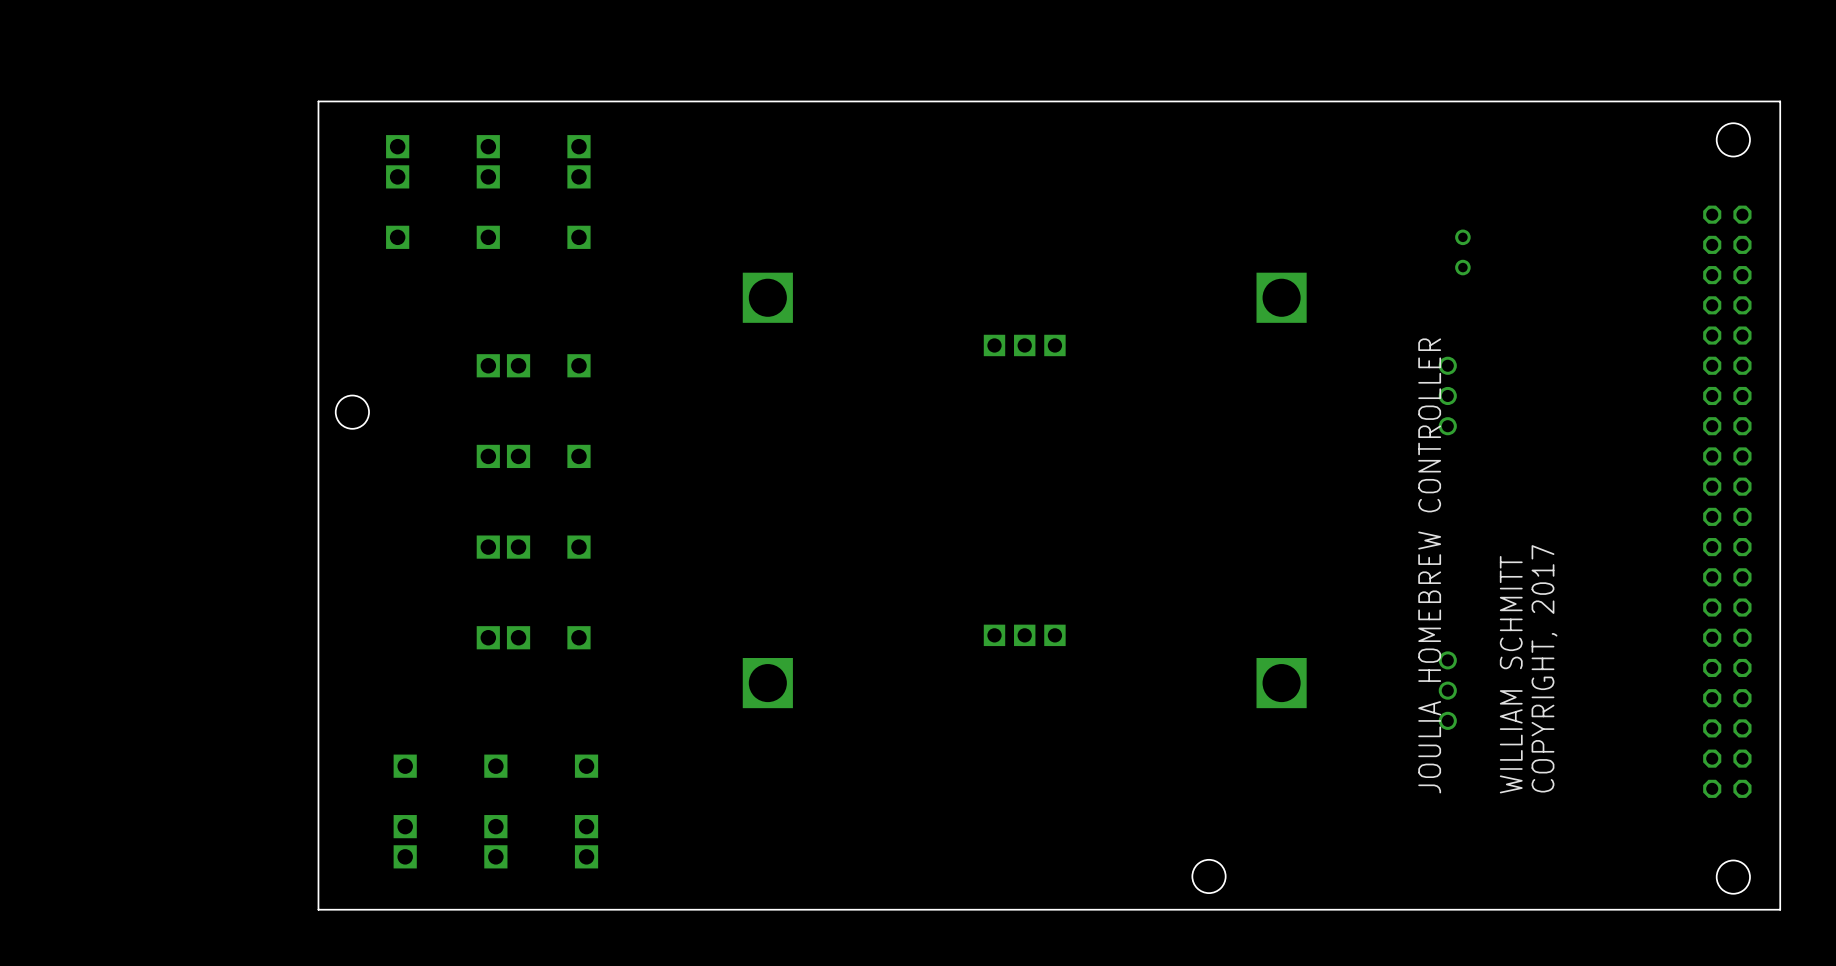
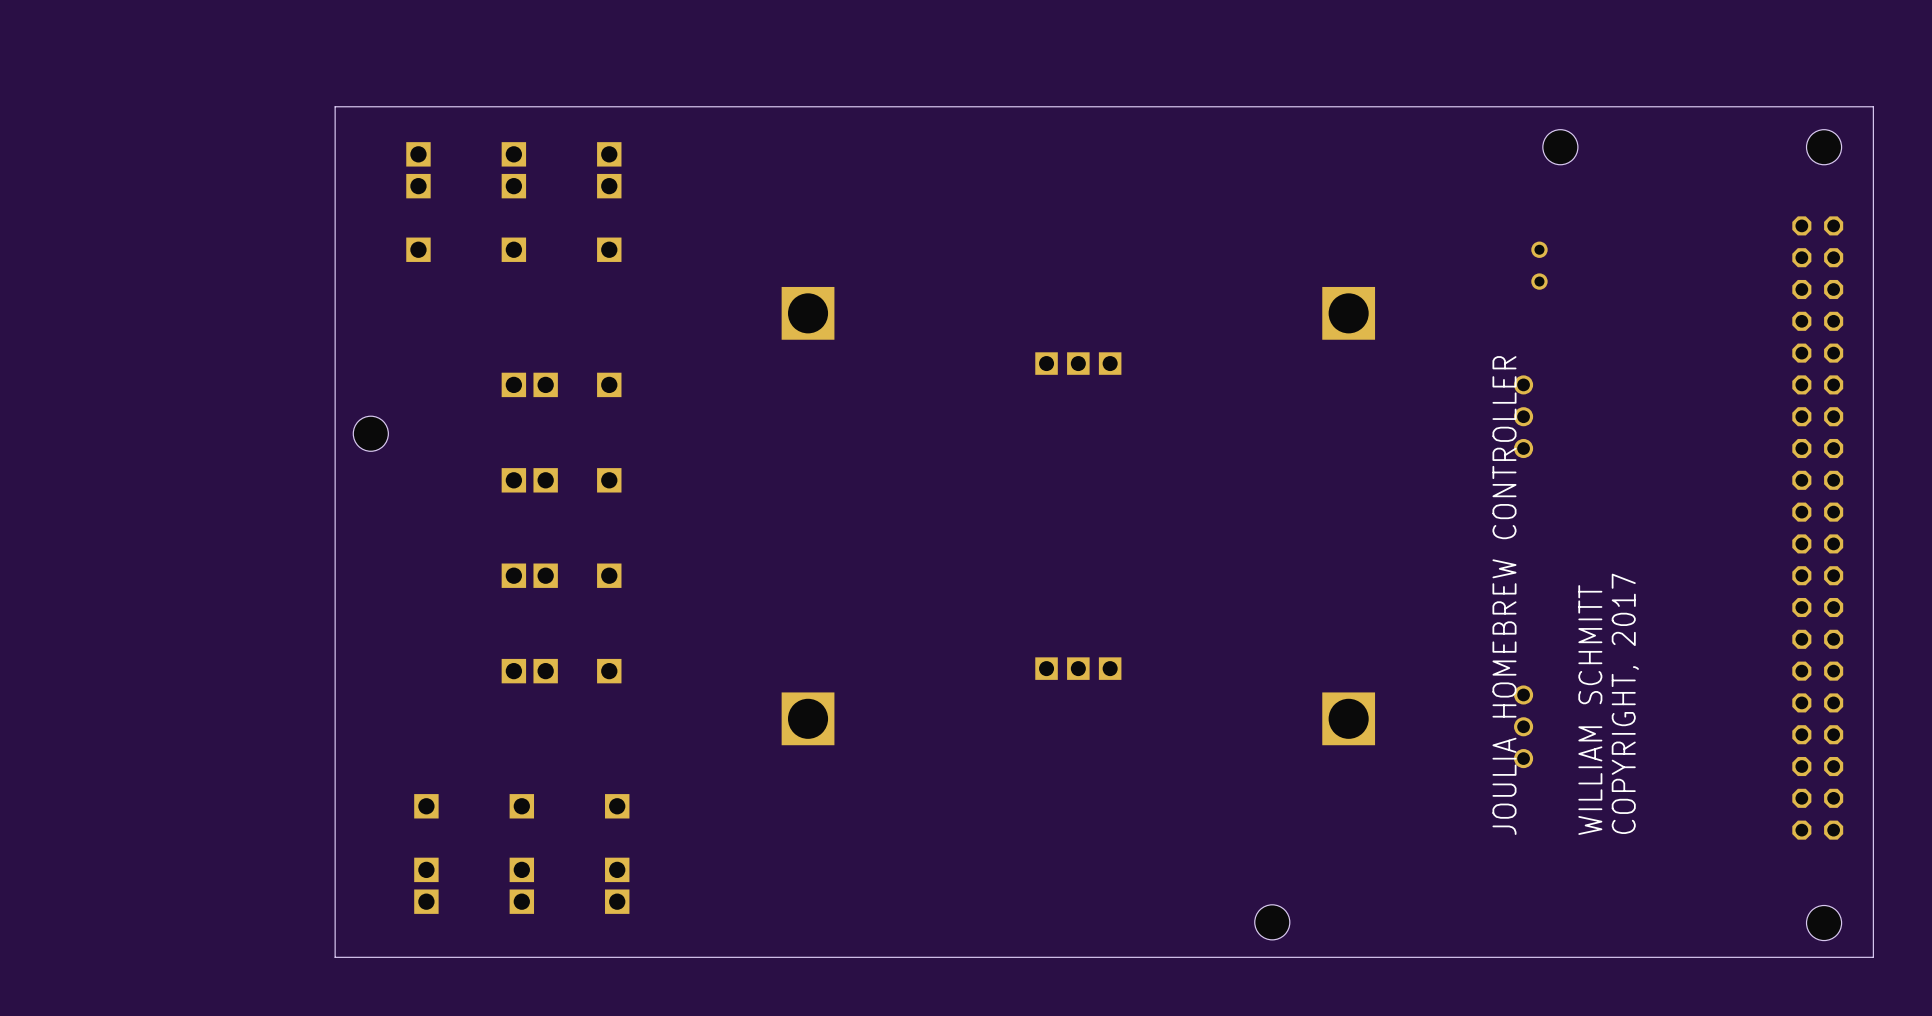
hole: none -> (1560, 147)

